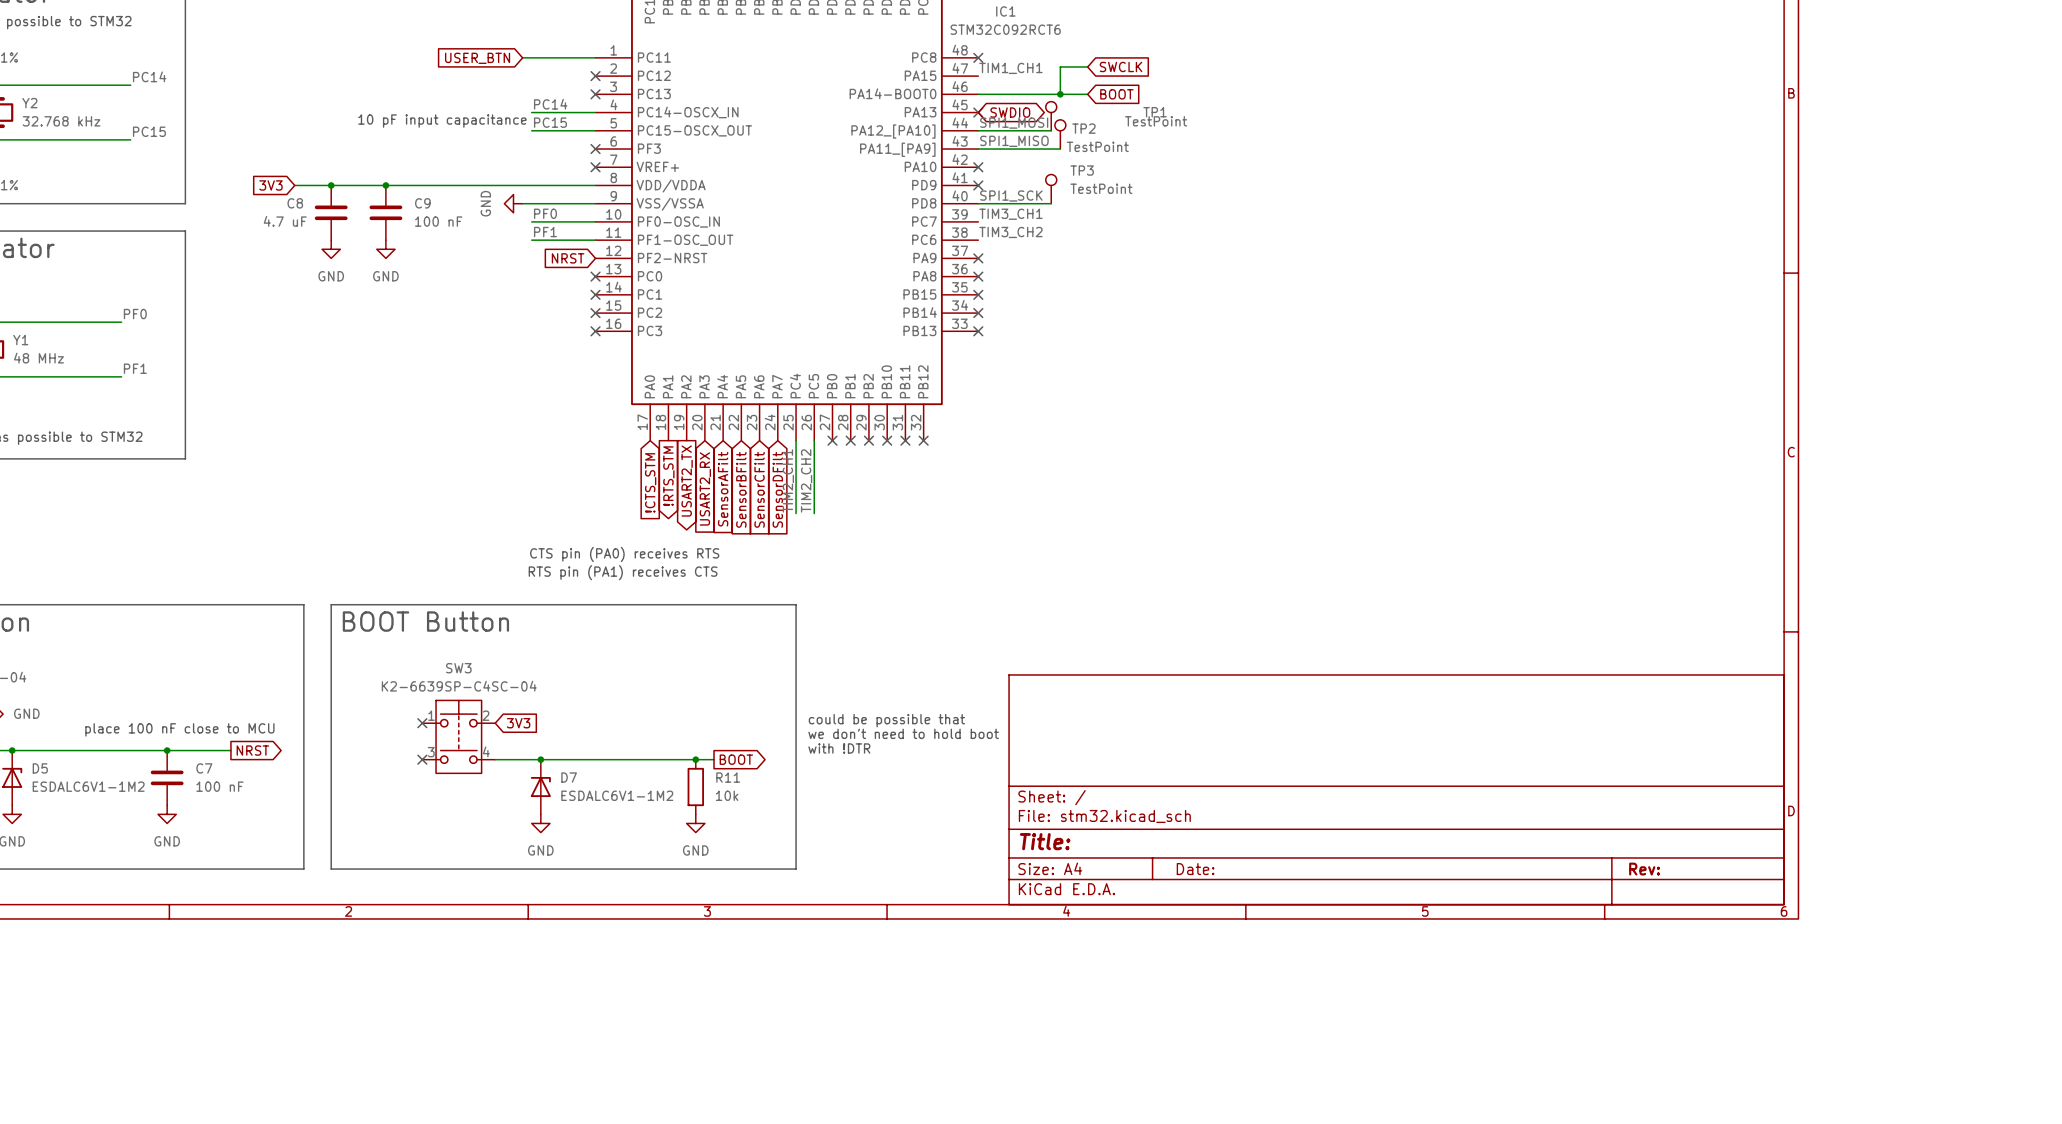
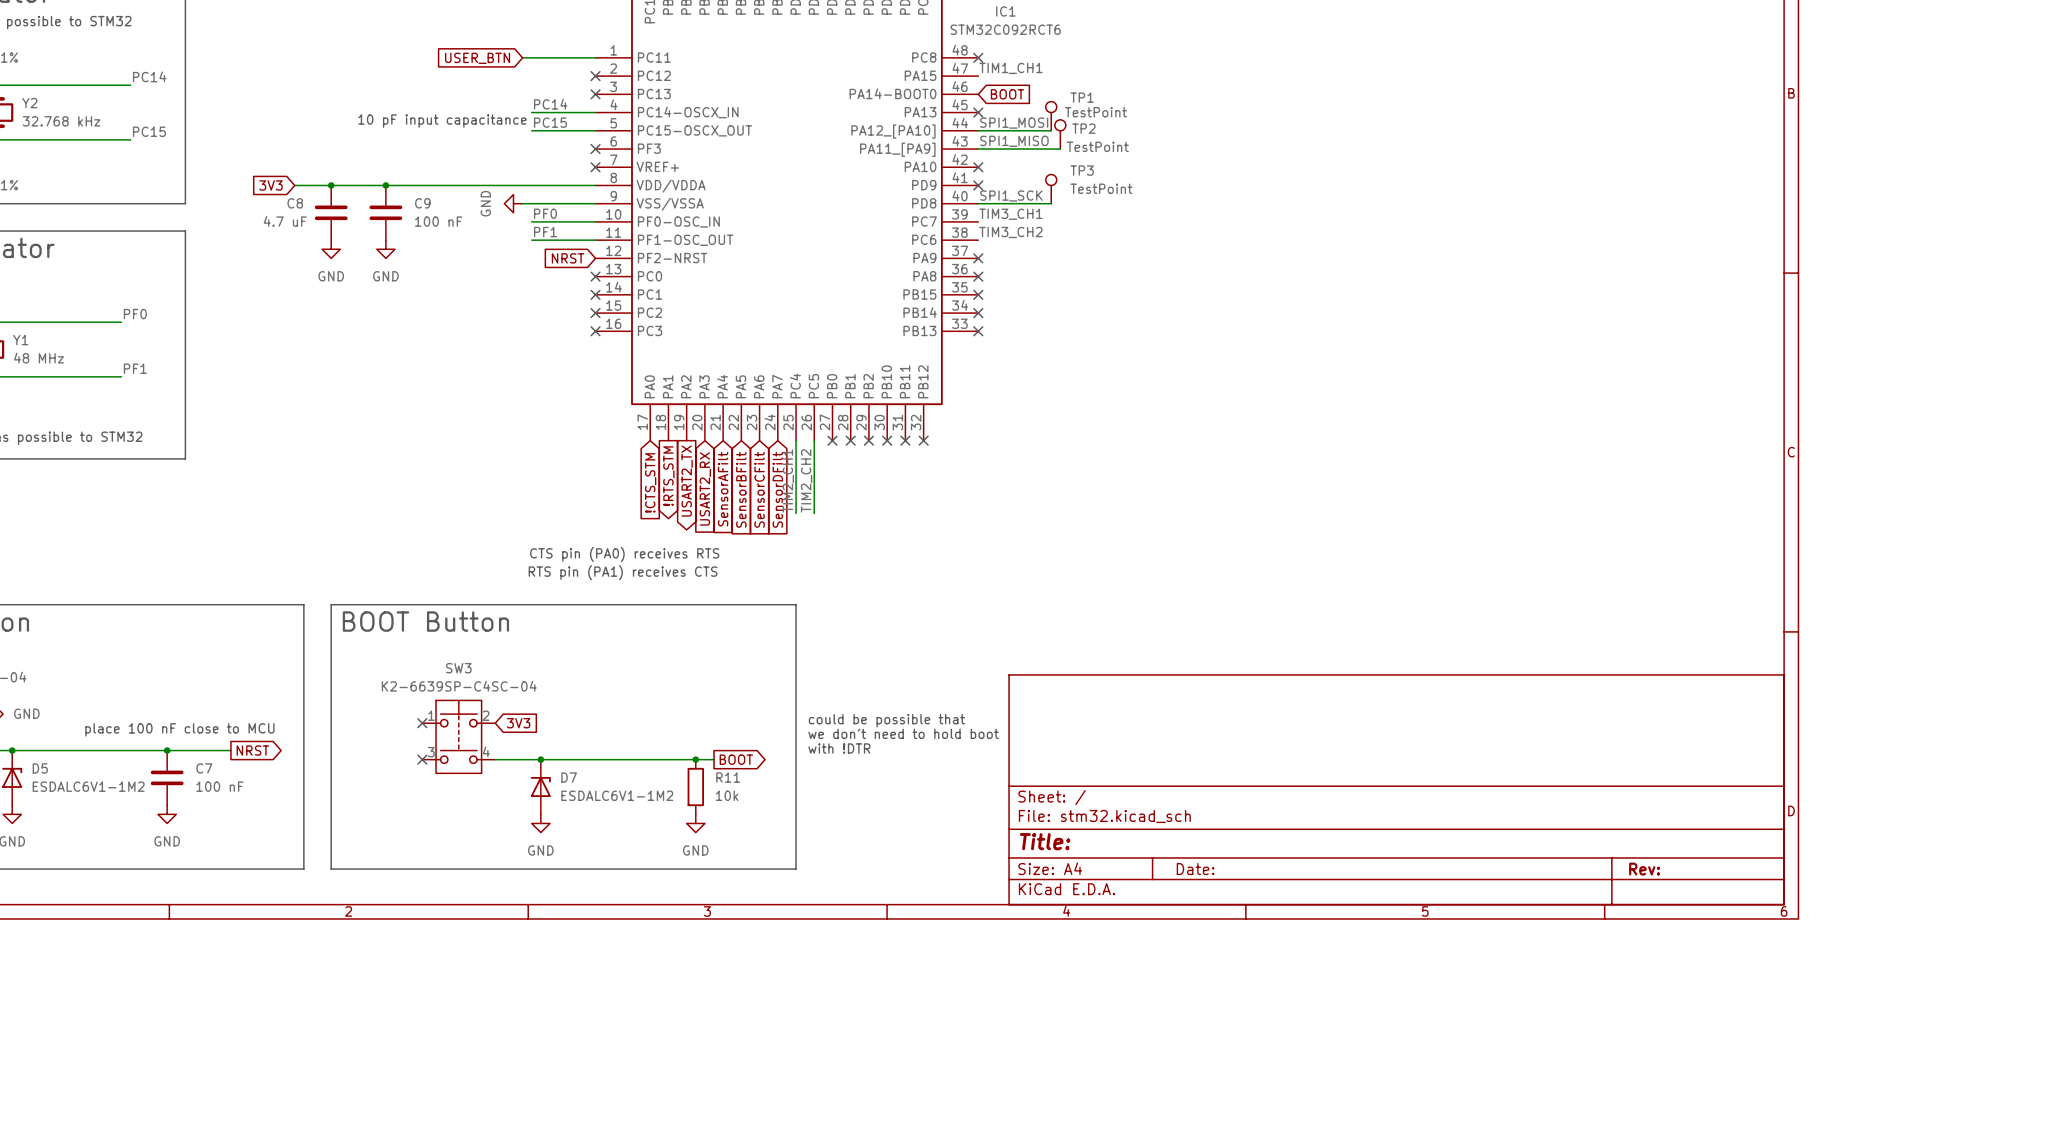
wire: (1087, 66) (1060, 66) (1060, 94) -> none
global label: SWCLK (1121, 66) -> none
wire: (978, 94) (1087, 94) -> none
junction: (1060, 94) -> none
global label position: BOOT (1116, 94) -> BOOT (1007, 94)
global label: SWDIO (1010, 112) -> none
TP1 name position: TP1 (1155, 112) -> TP1 (1082, 97)
TP1 value position: TestPoint (1156, 121) -> TestPoint (1095, 112)

